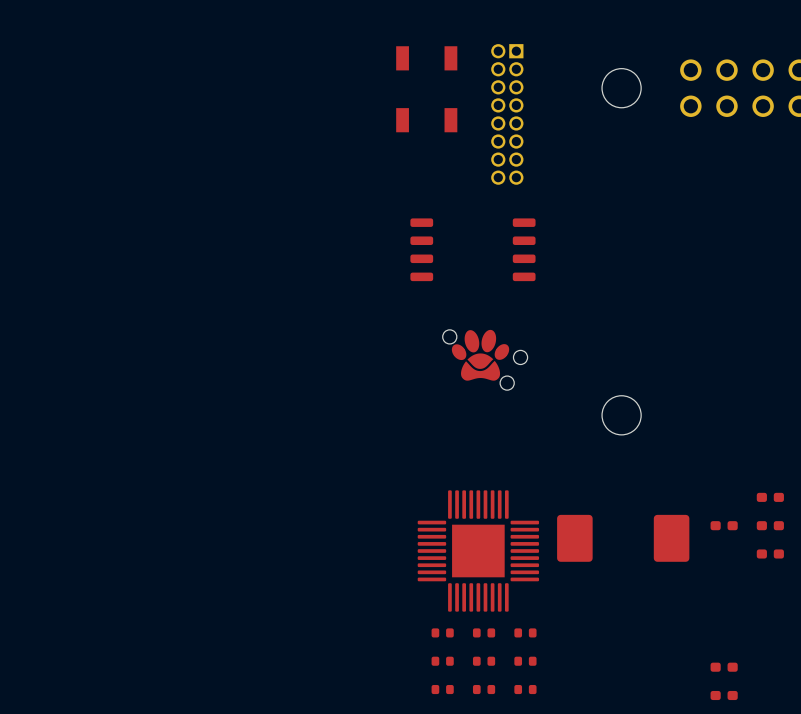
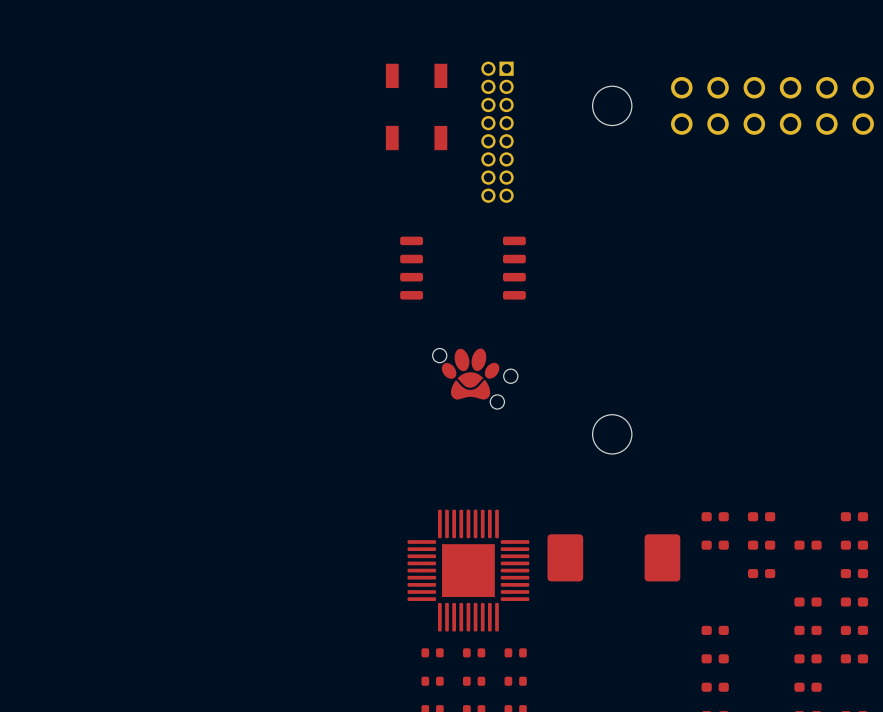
part: none -> (715, 516)
part: none -> (715, 630)
part: none -> (715, 658)

